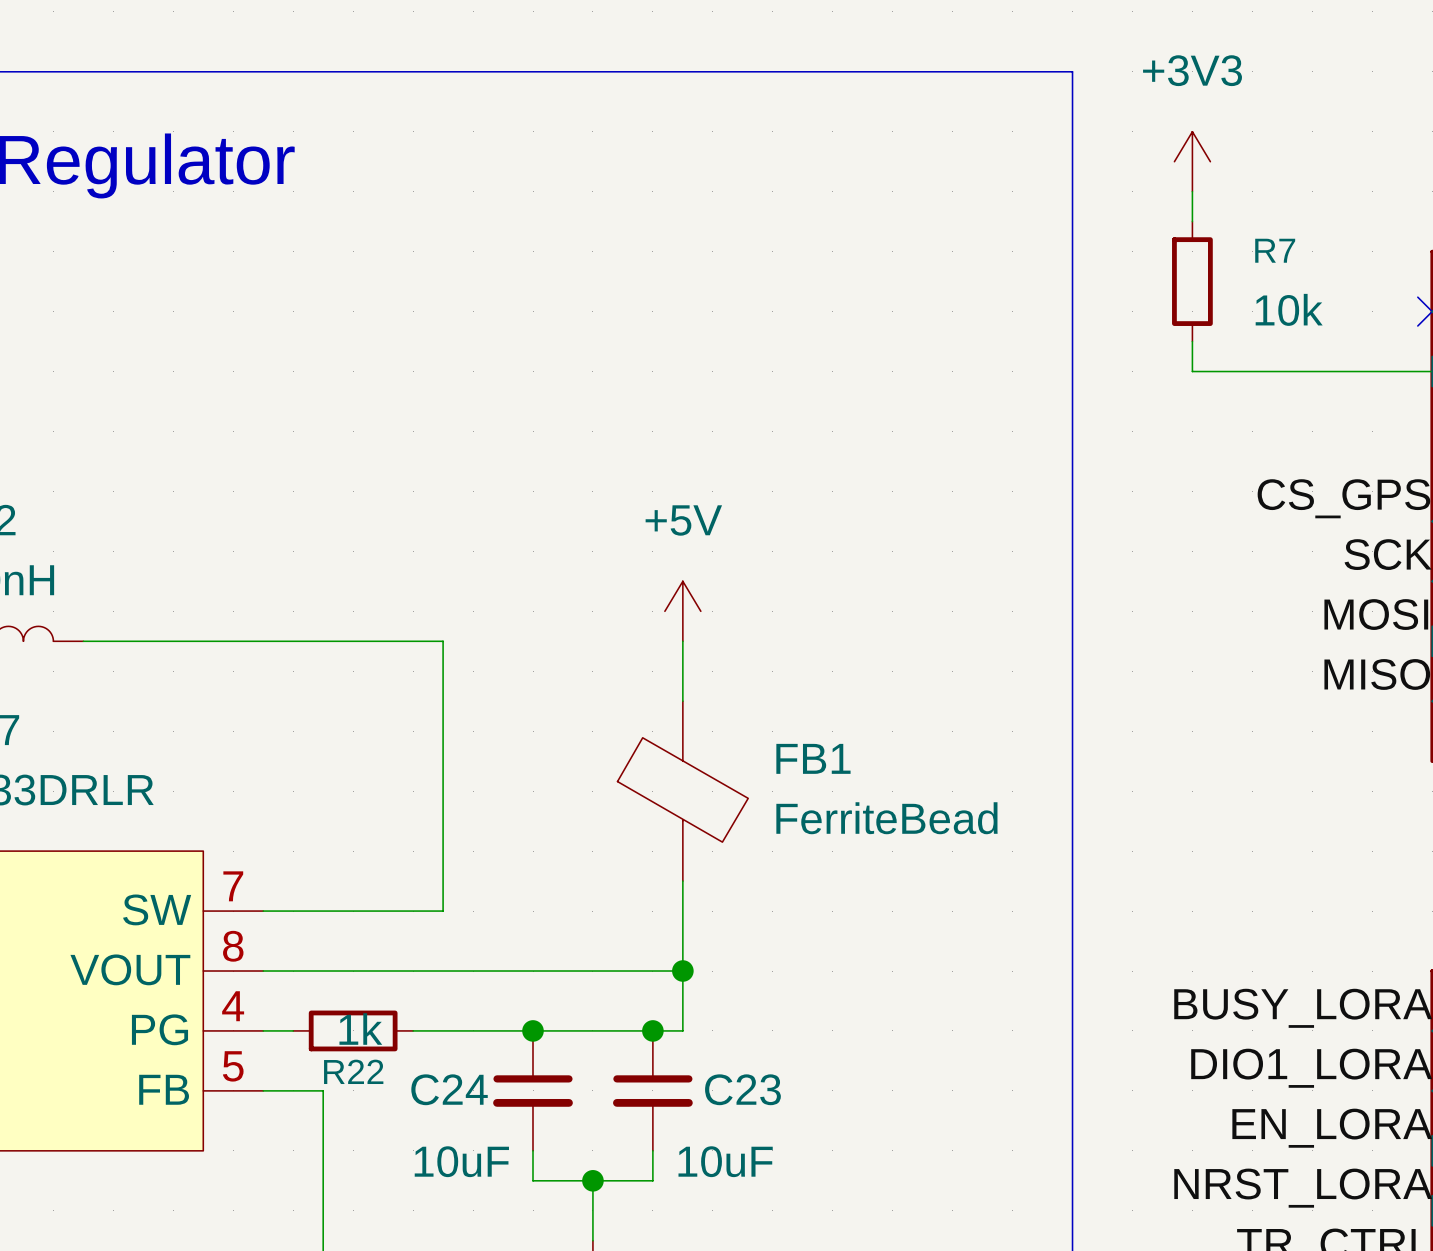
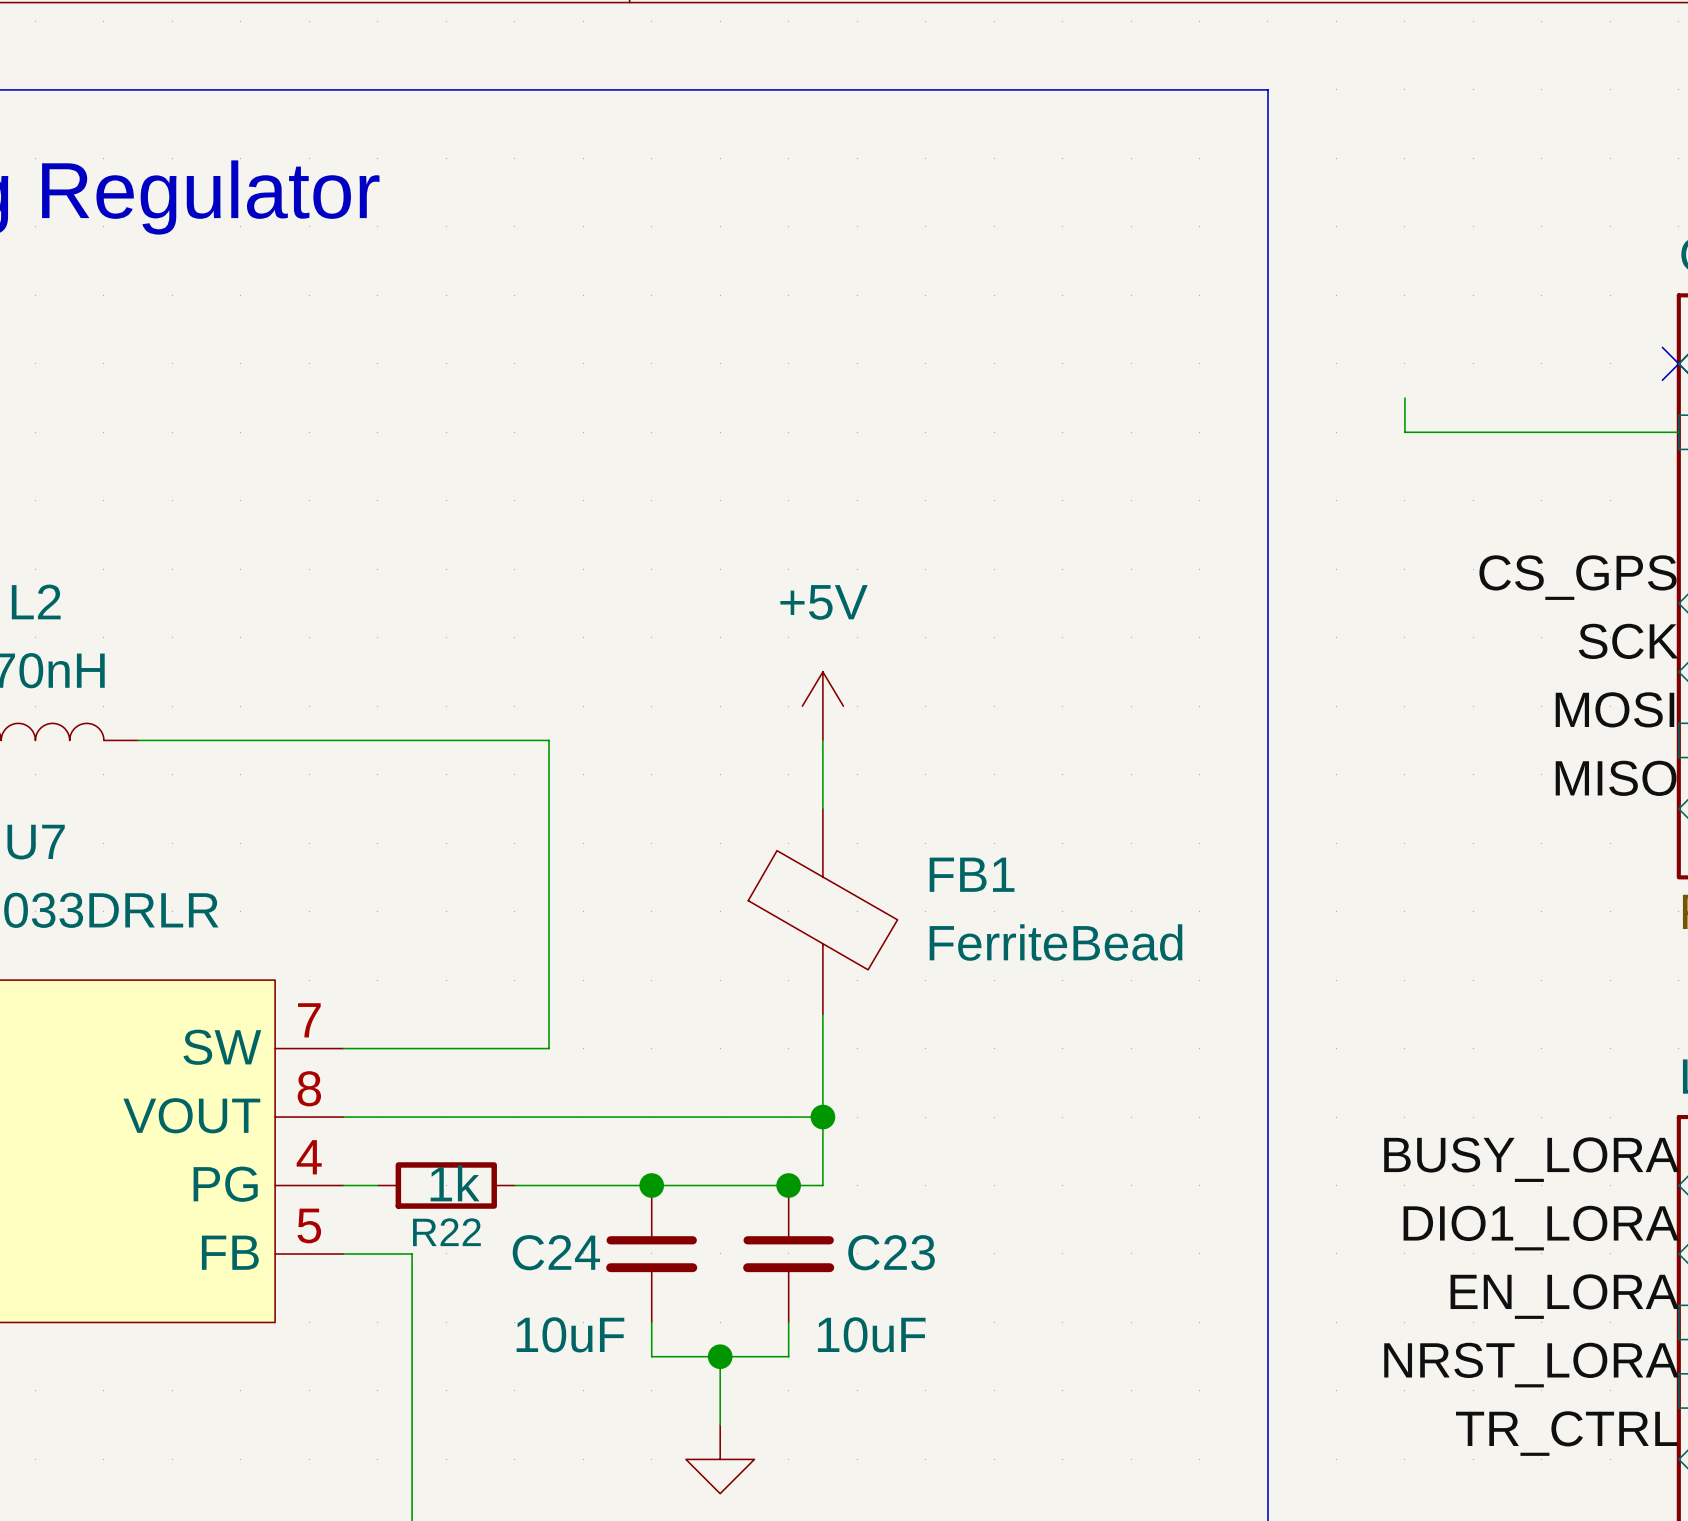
power symbol: +3V3 (1192, 161) -> none
wire: (1192, 191) (1192, 221) -> none
R7: 10k (1192, 281) -> none

